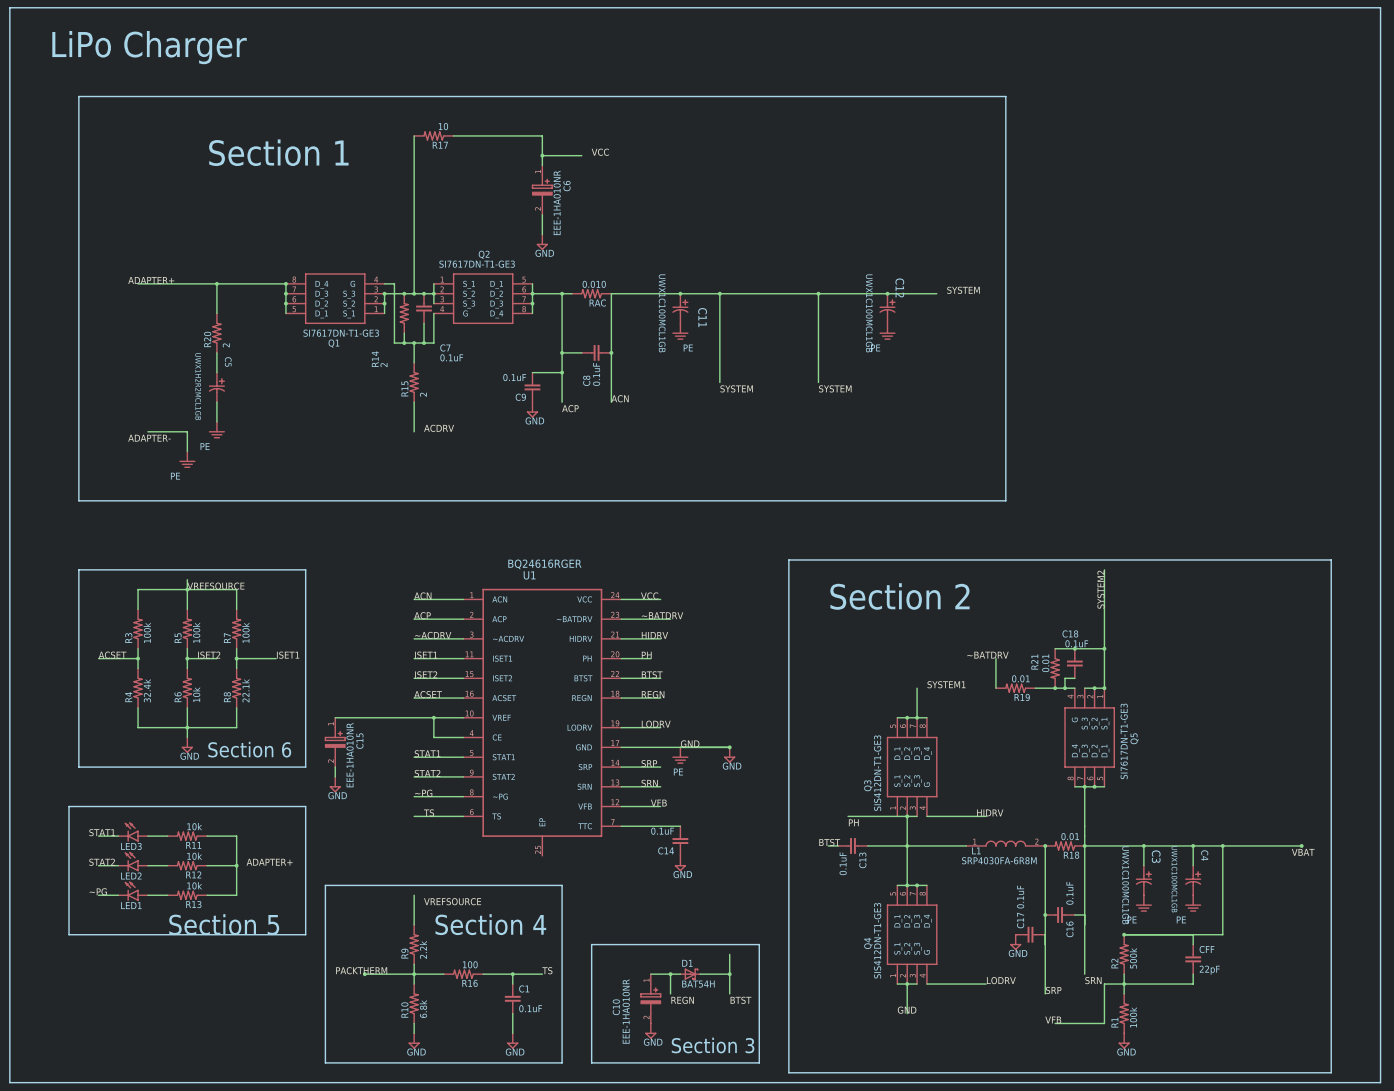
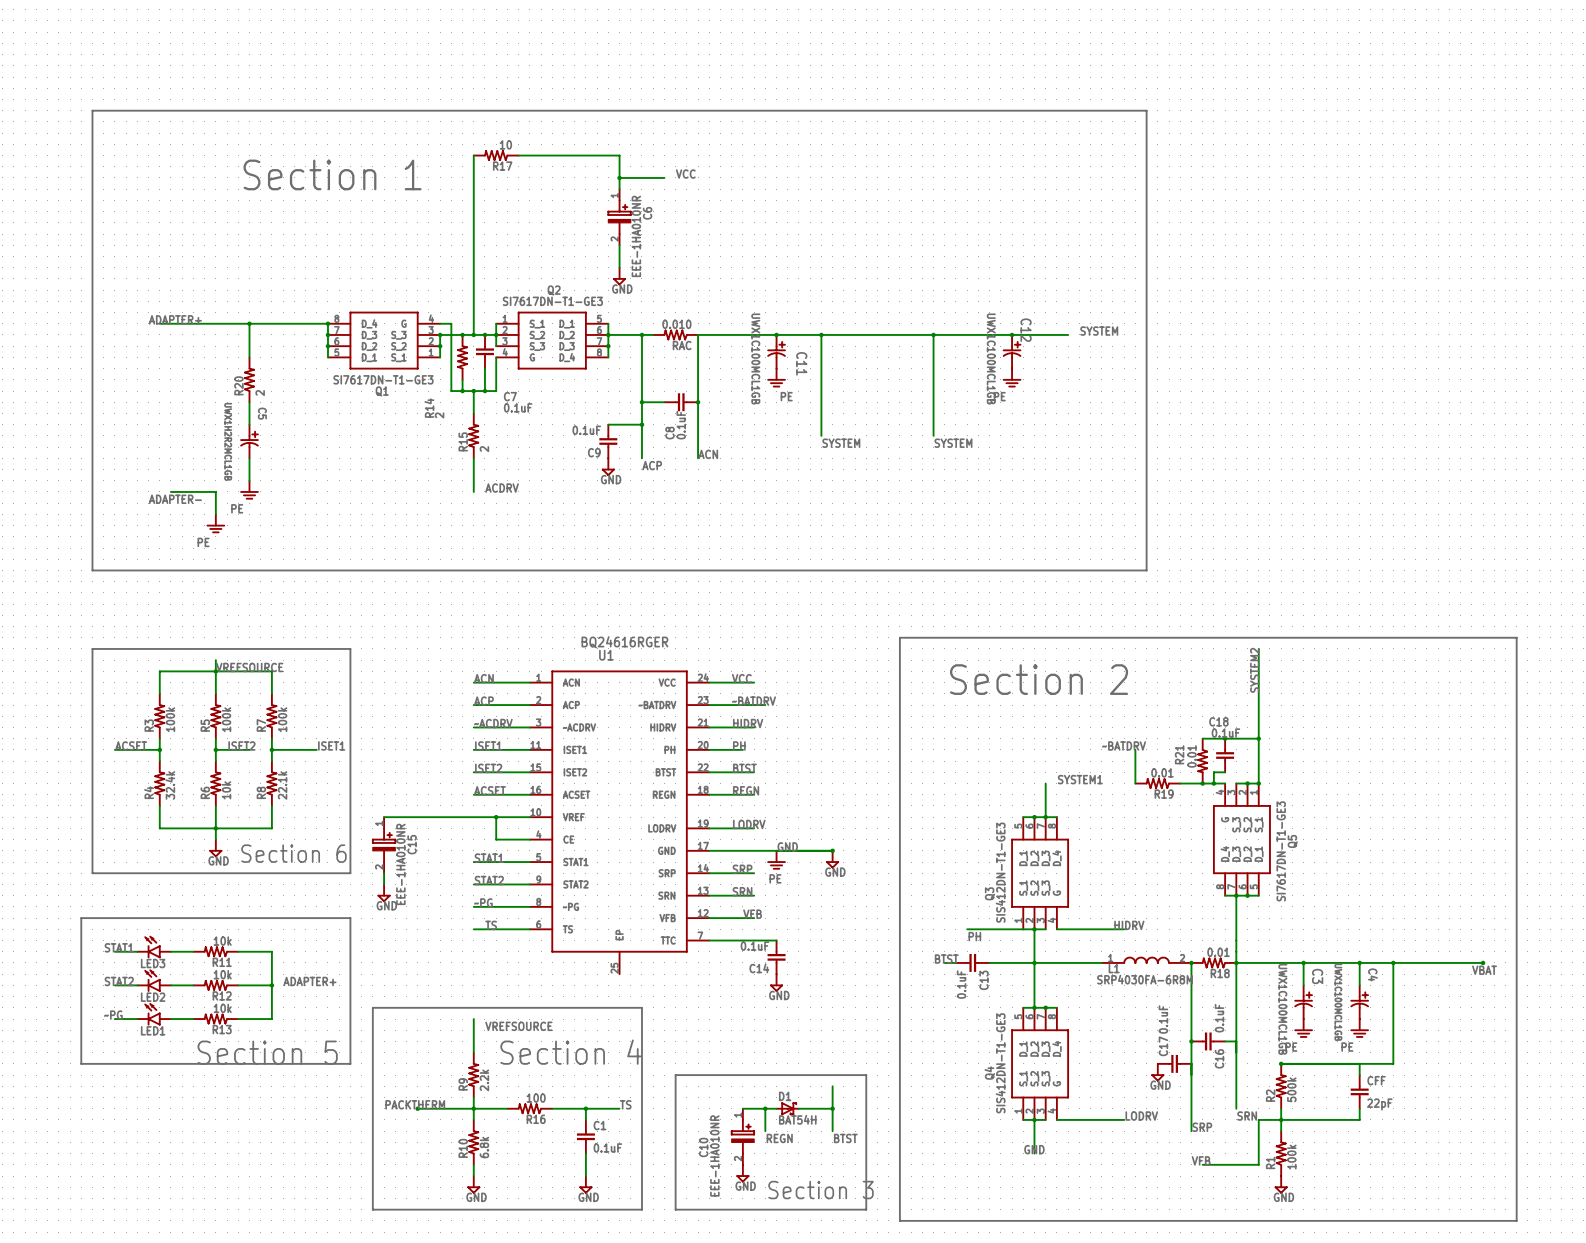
line: (9, 7) (9, 1082) (1380, 1082) (1380, 7) (9, 7) -> none
text: LiPo Charger (149, 47) -> none

